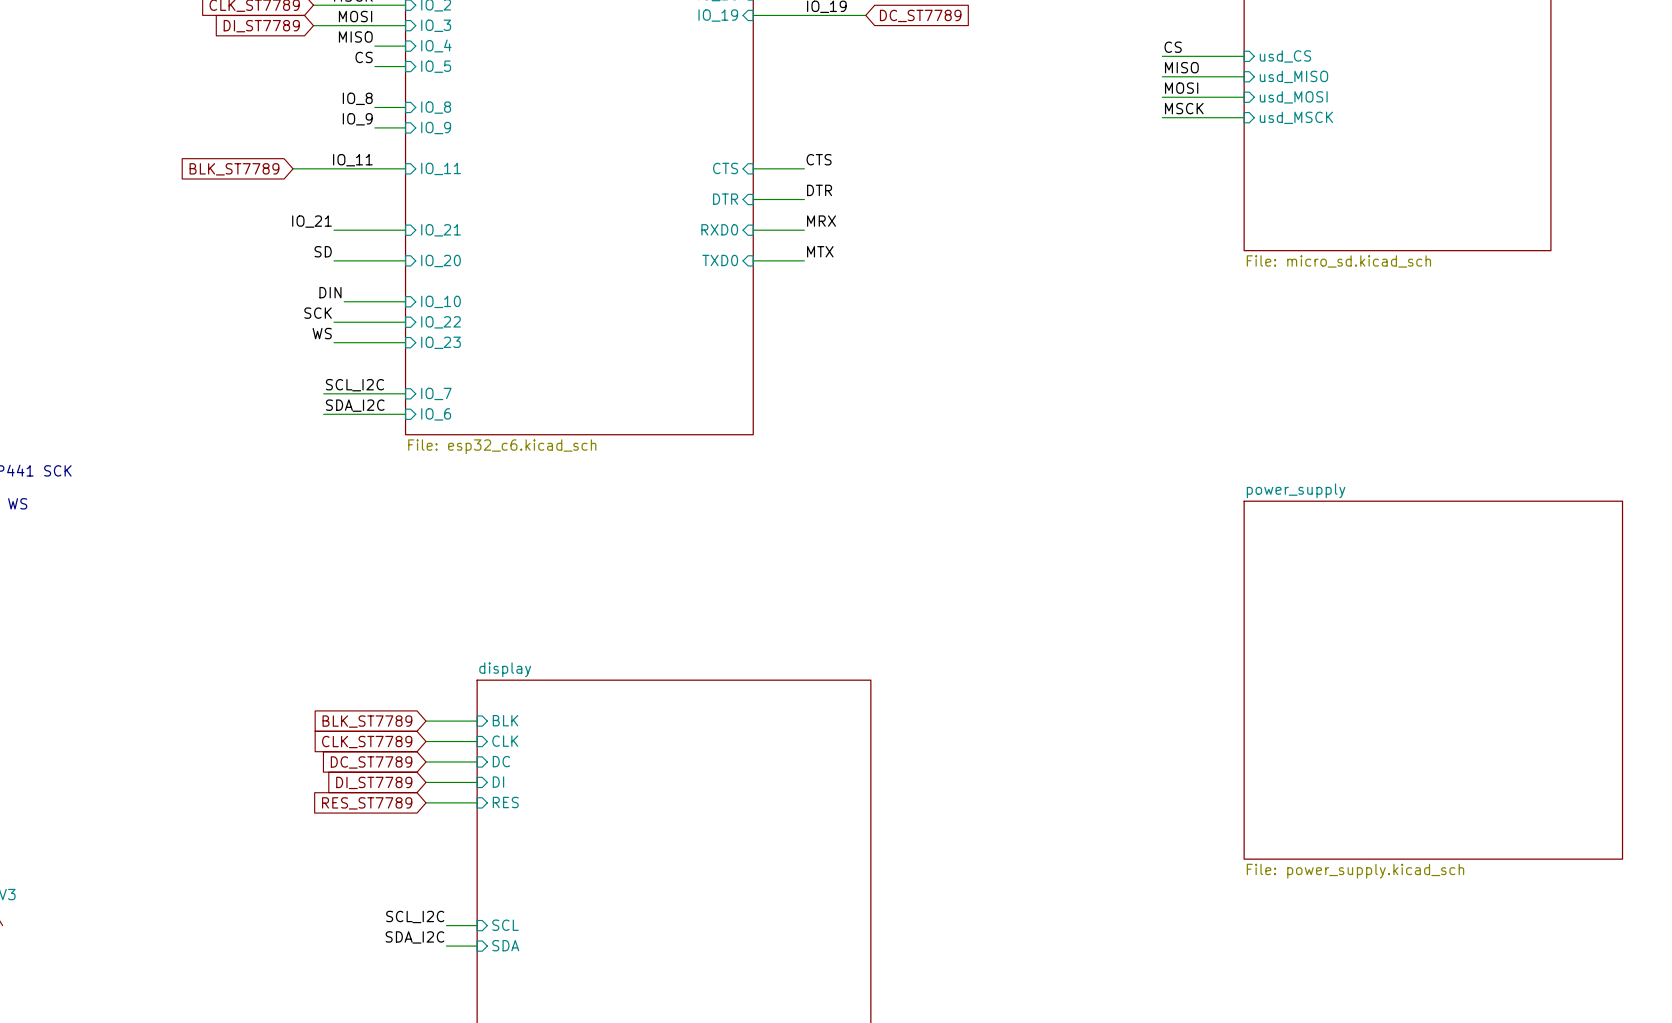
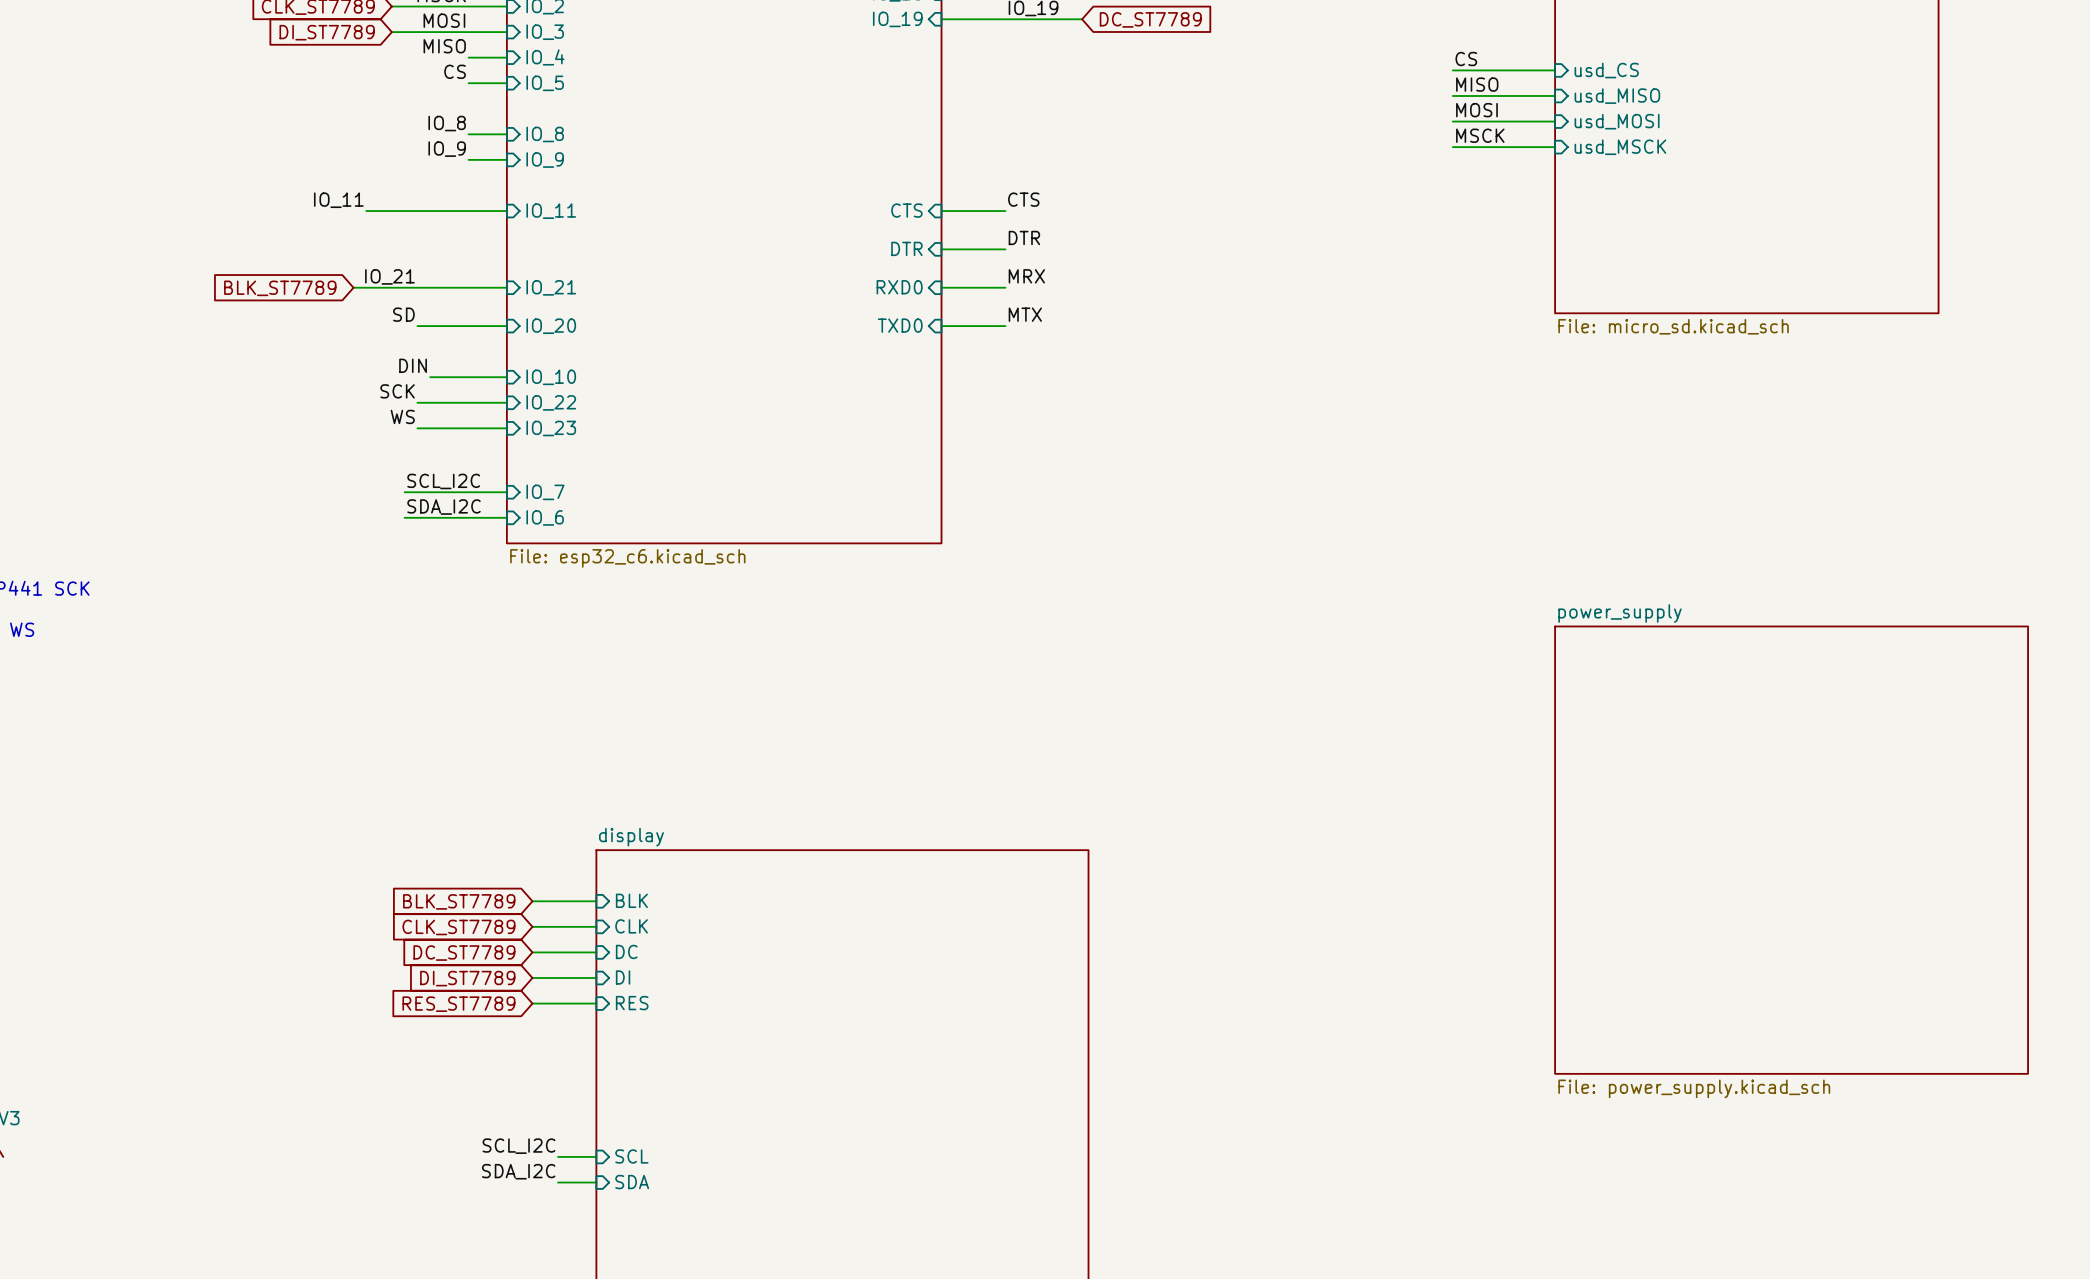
label position: IO_11 (352, 160) -> IO_11 (338, 200)
global label position: BLK_ST7789 (234, 169) -> BLK_ST7789 (280, 288)
wire: none -> (353, 287) (417, 287)

